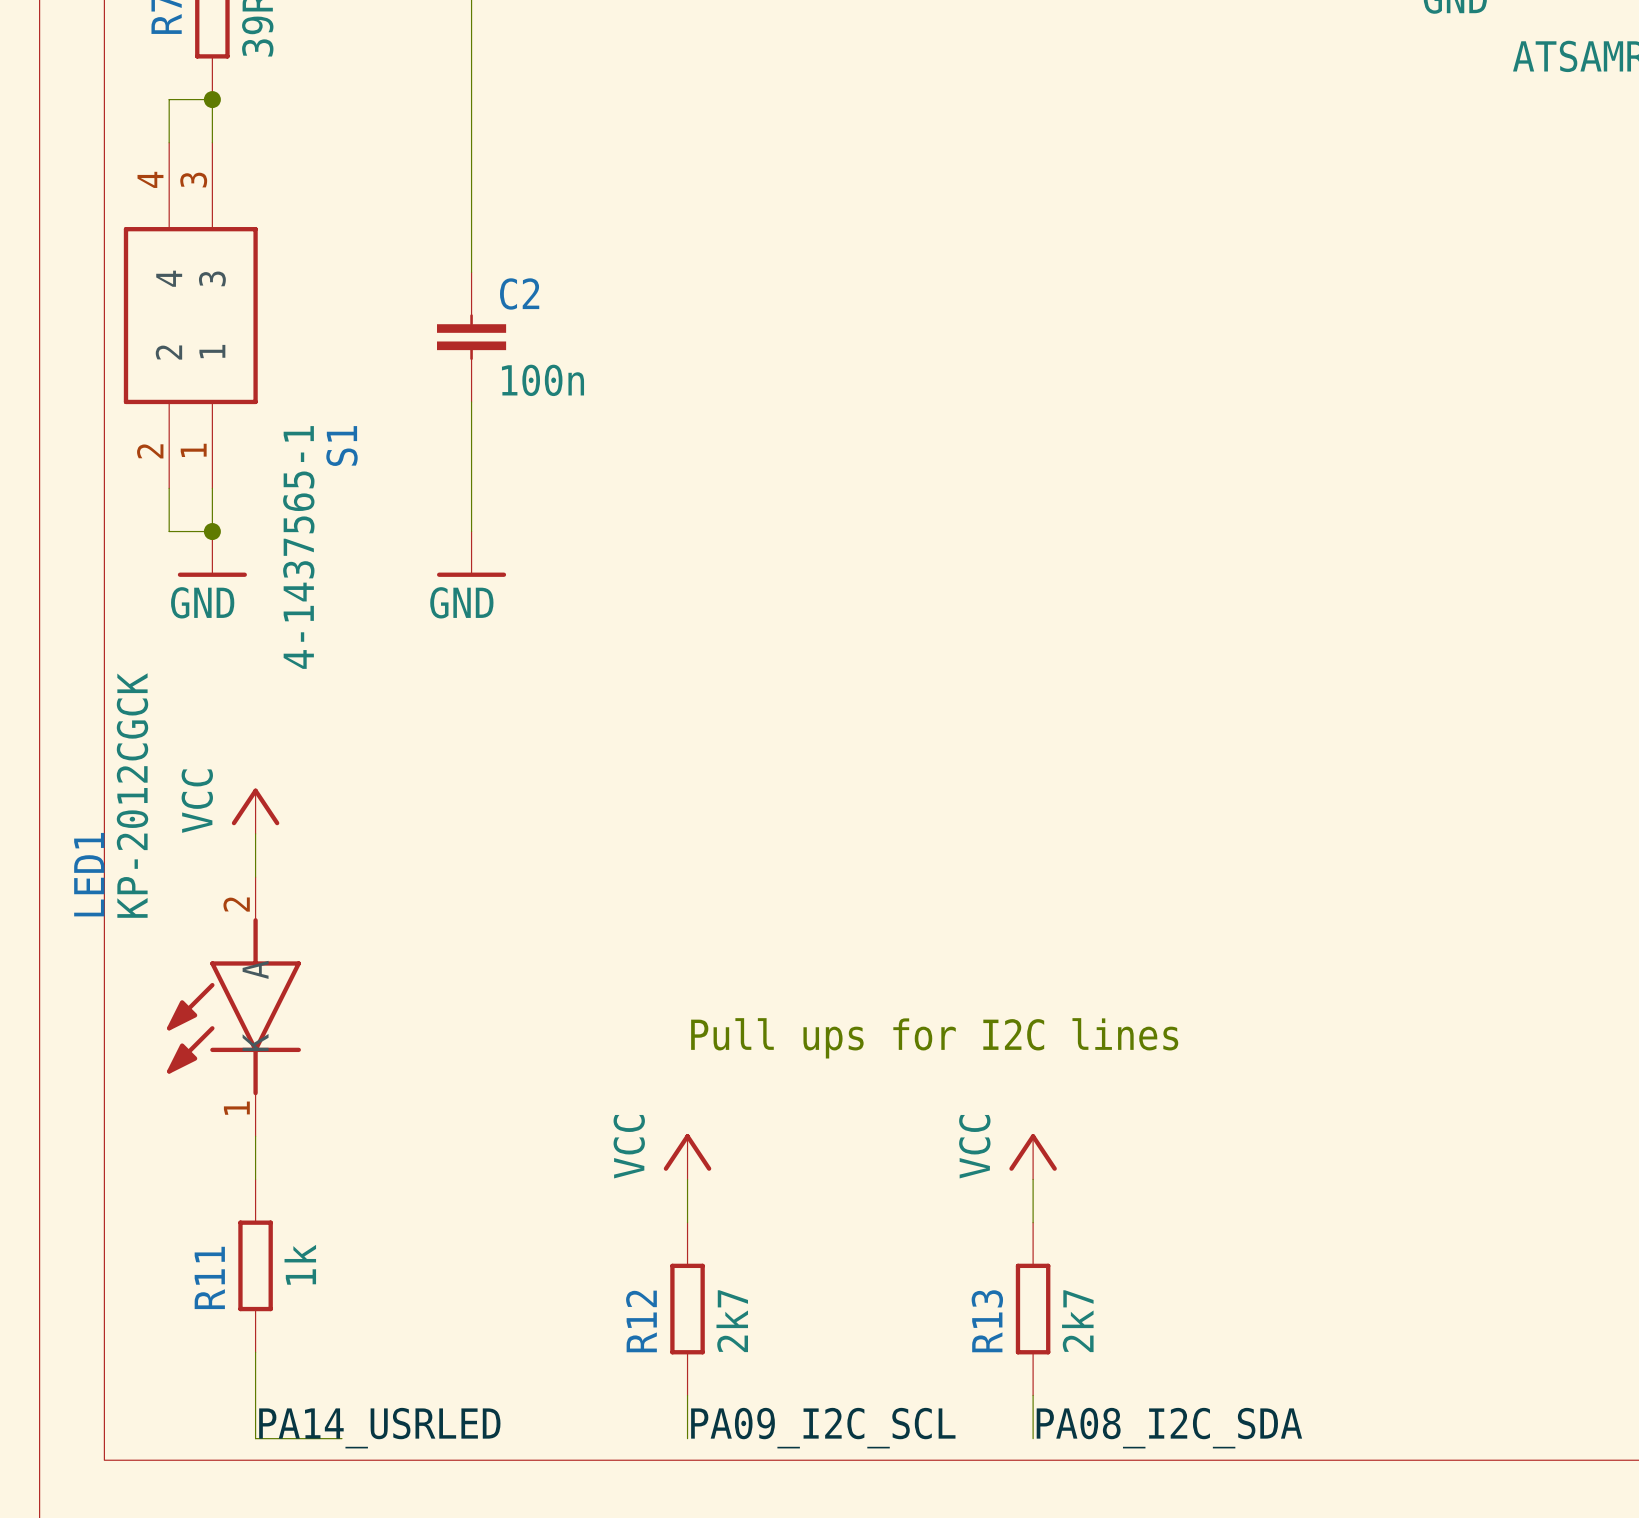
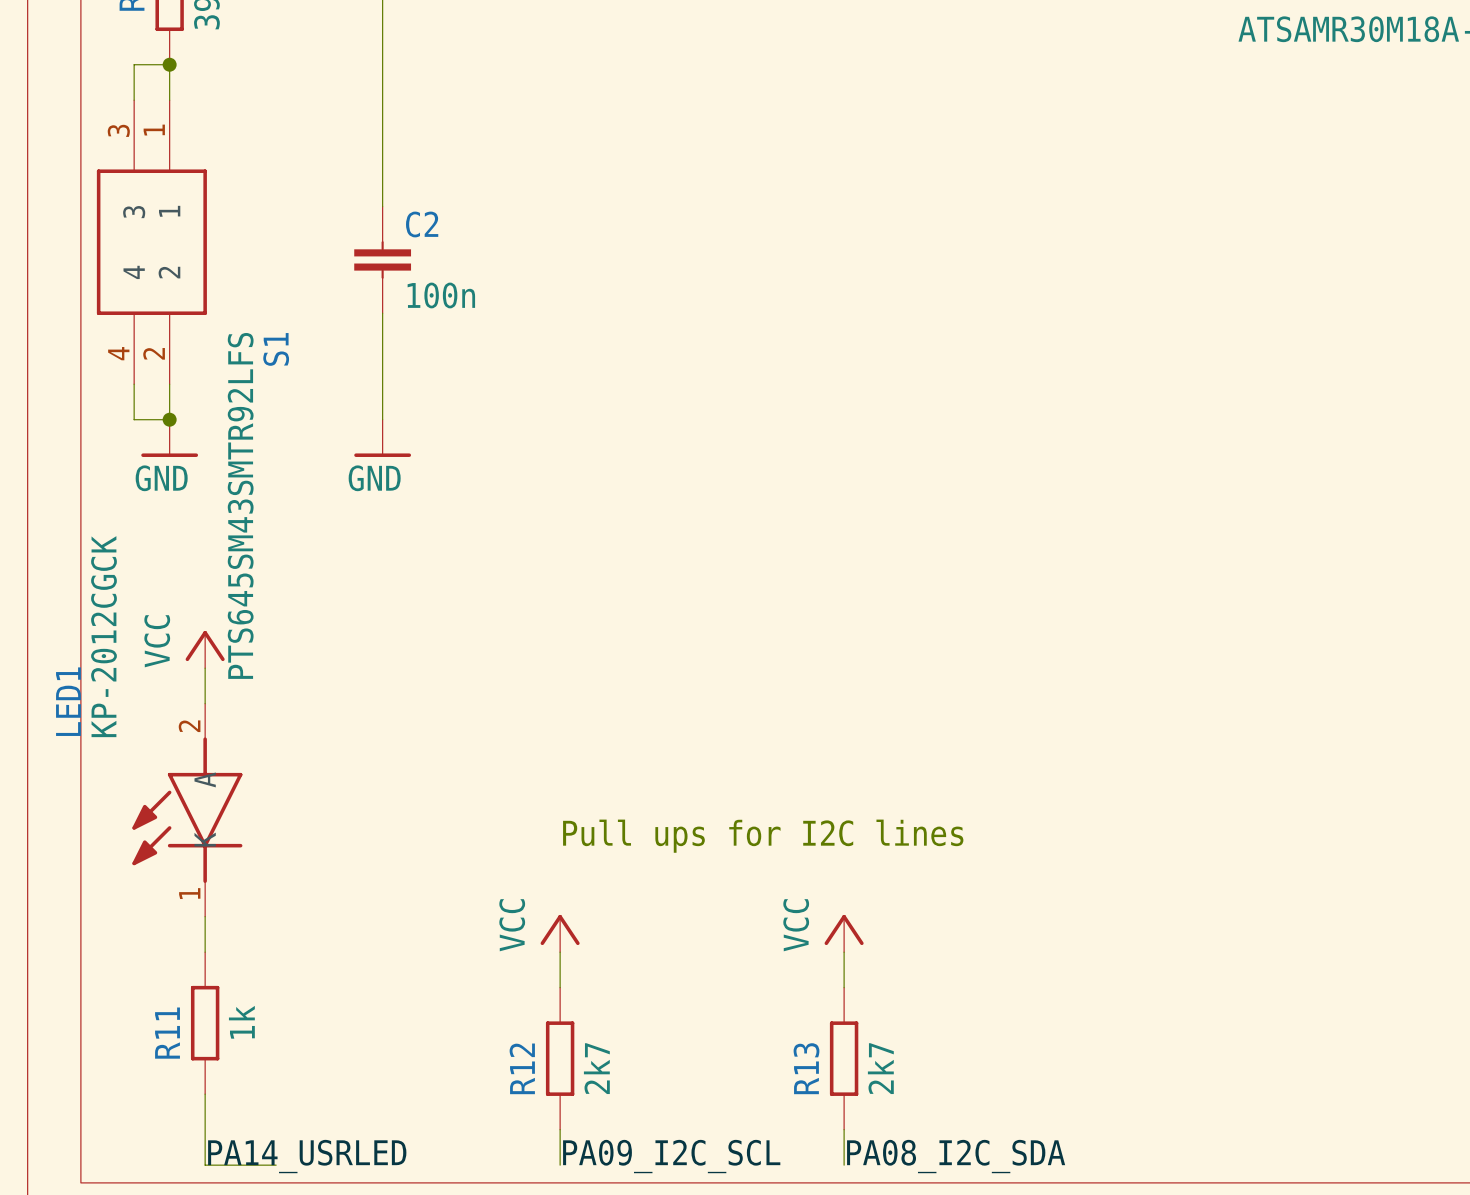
S1 pin number: 4 (150, 179) -> 3 (118, 130)
S1 pin number: 3 (193, 180) -> 1 (154, 130)
S1 pin name: 4 (169, 278) -> 3 (134, 212)
S1 pin name: 3 (212, 278) -> 1 (169, 211)
S1 pin name: 1 (212, 351) -> 2 (169, 272)
S1 pin name: 2 (168, 352) -> 4 (134, 272)
S1 pin number: 1 (193, 450) -> 2 (154, 353)
S1 pin number: 2 (150, 451) -> 4 (118, 353)
S1 value: 4-1437565-1 (298, 547) -> PTS645SM43SMTR92LFS (240, 505)

